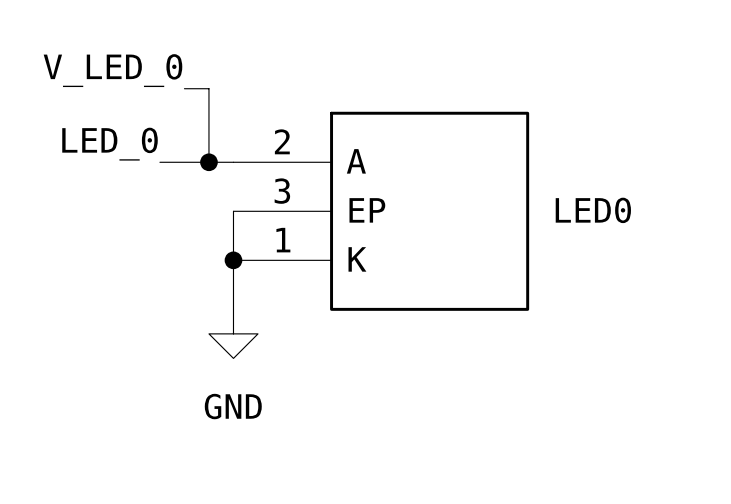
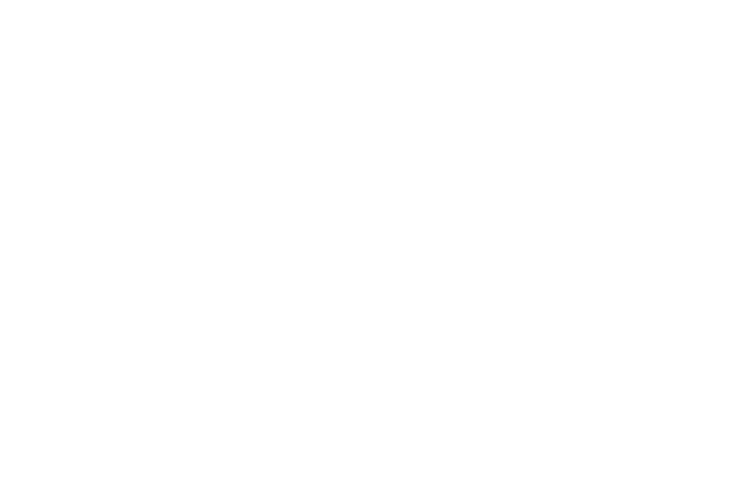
label: V_LED_0 (112, 70) -> none
wire: (184, 88) (208, 88) (208, 162) -> none
label: LED_0 (110, 144) -> none
wire: (159, 162) (233, 162) -> none
junction: (208, 162) -> none
wire: (233, 211) (233, 309) -> none
LED0: (381, 211) -> none
junction: (233, 260) -> none
power symbol: GND (233, 333) -> none

